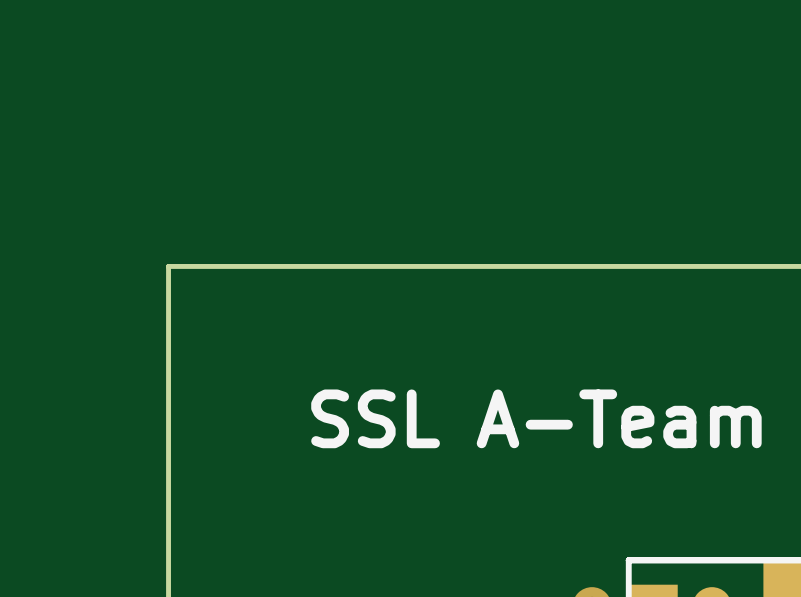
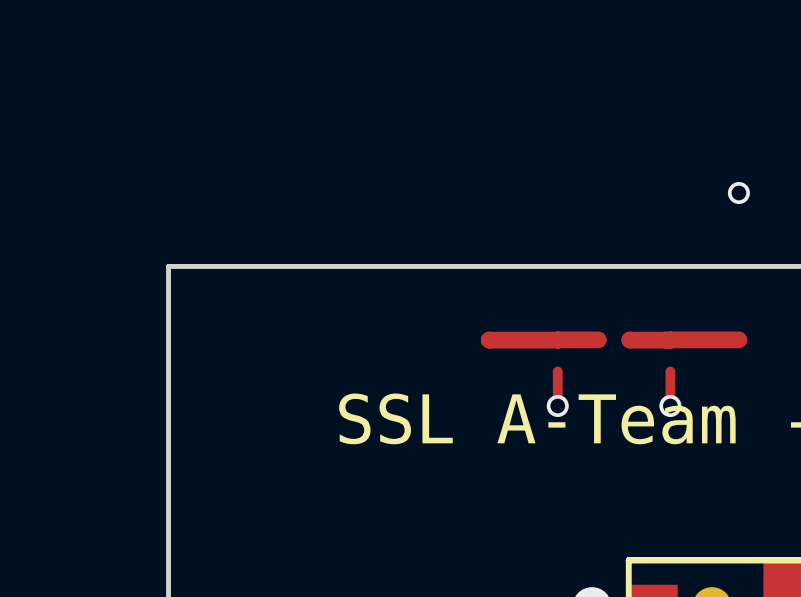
via: none -> (738, 193)
track: none -> (558, 339) (598, 339)
track: none -> (670, 339) (738, 339)
track: none -> (489, 340) (557, 340)
track: none -> (629, 340) (670, 340)
track: none -> (557, 371) (557, 405)
track: none -> (670, 371) (670, 405)
via: none -> (557, 405)
via: none -> (670, 405)

